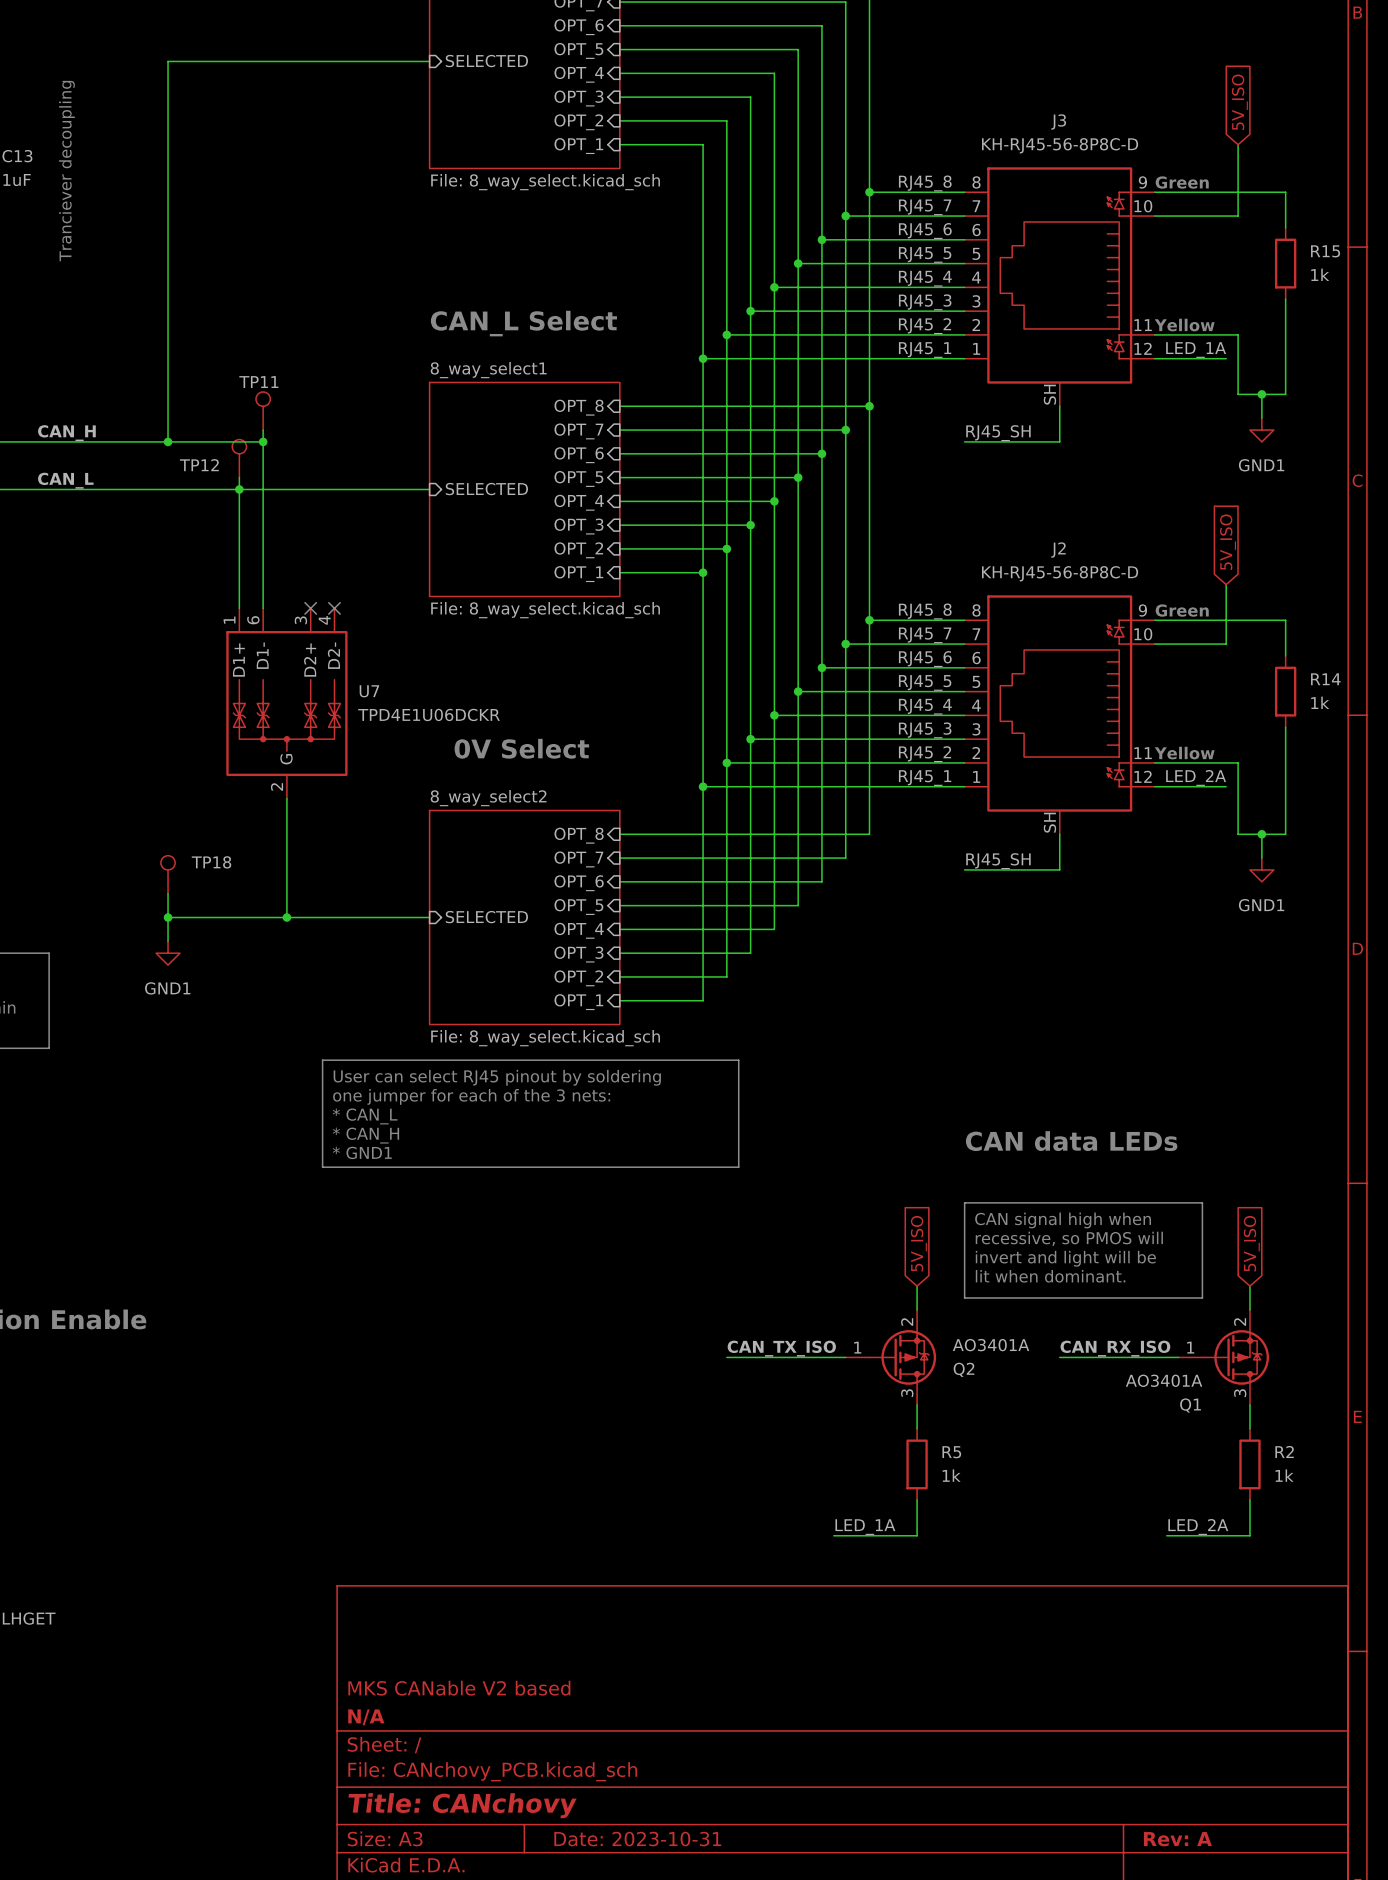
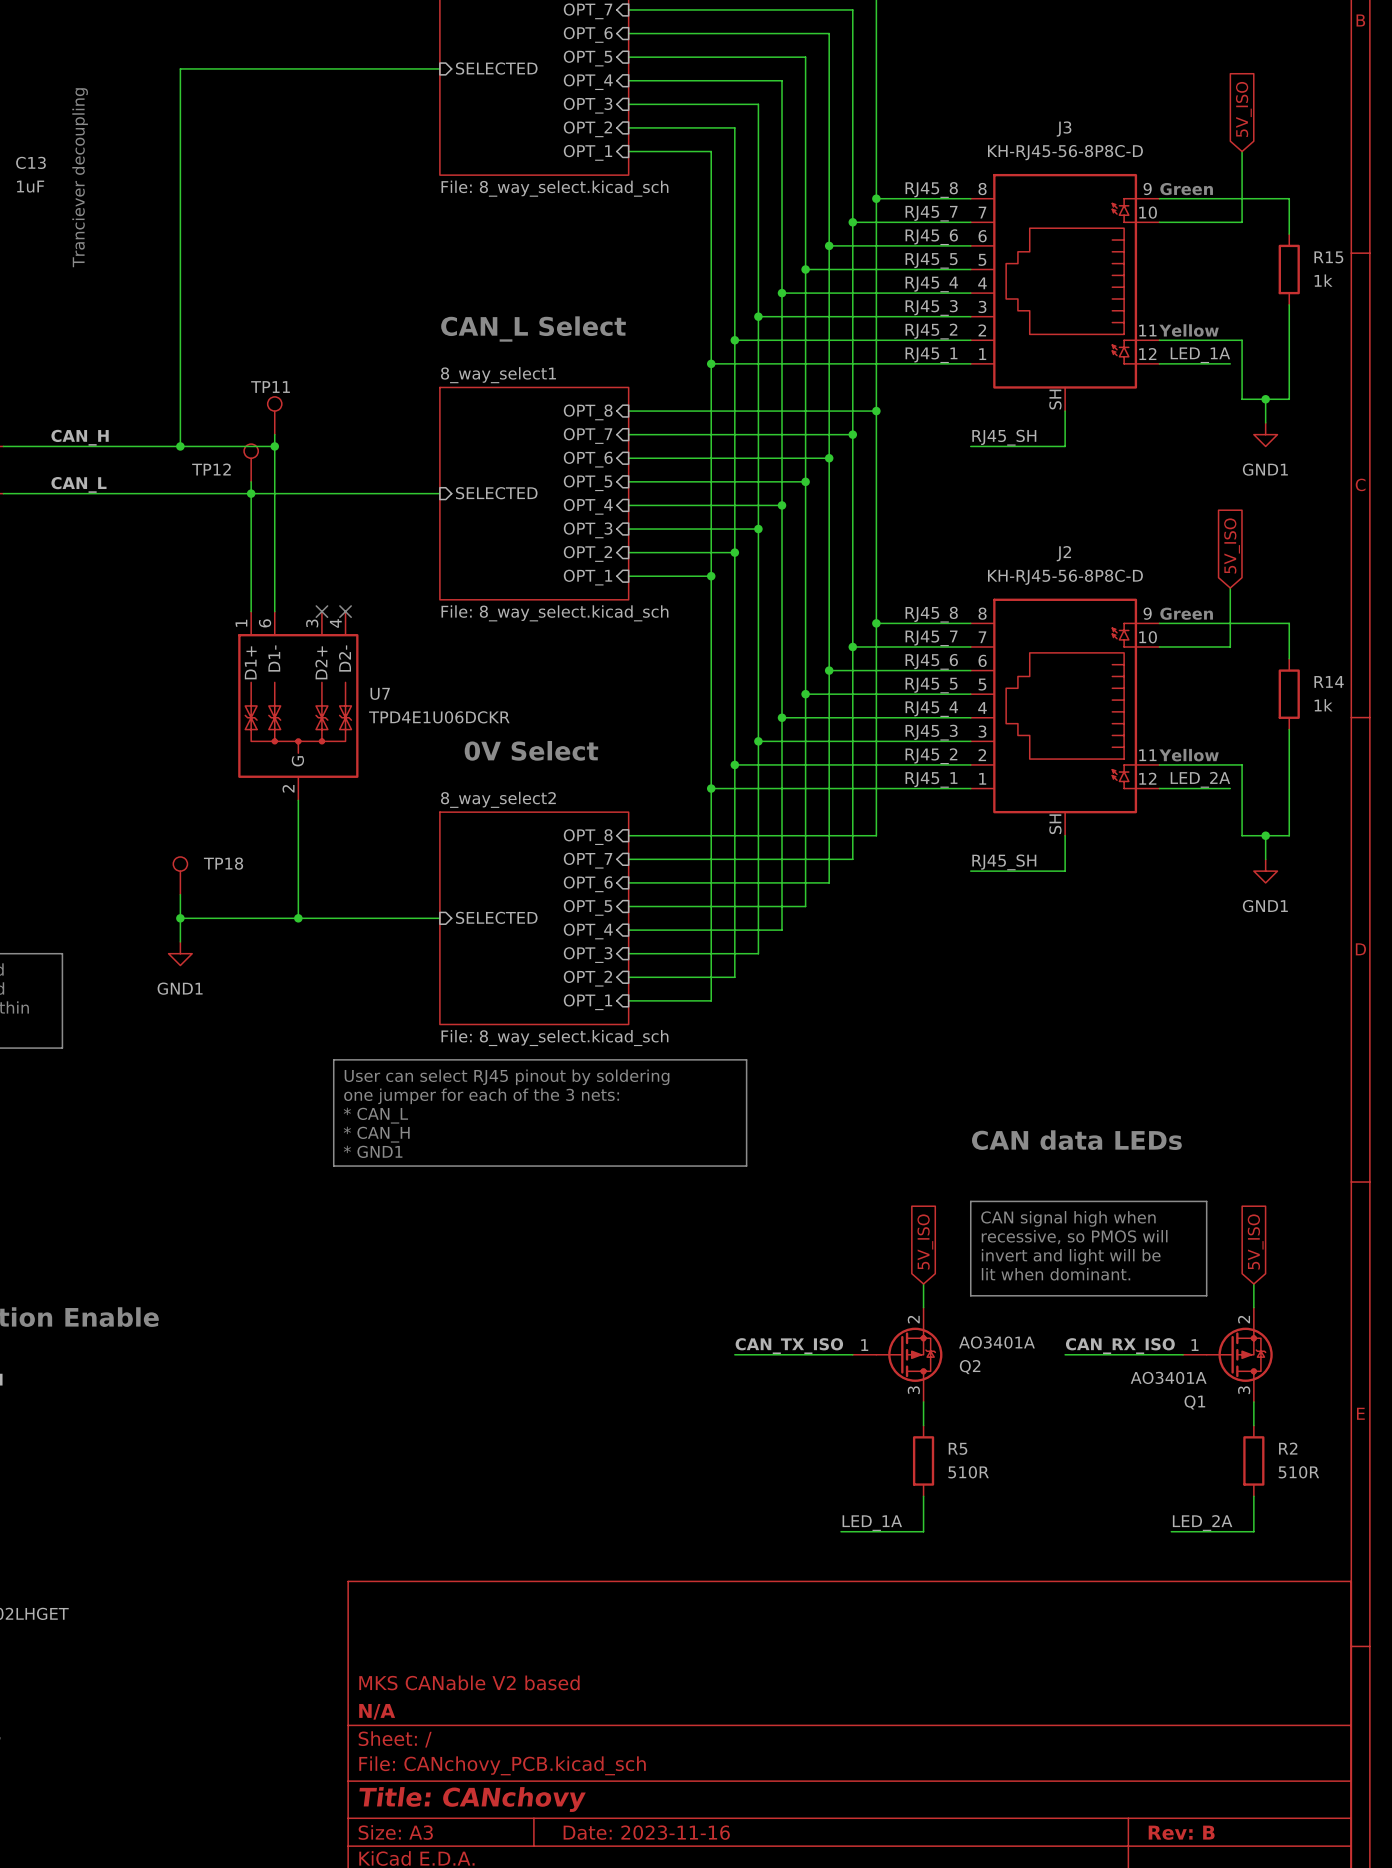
R5 value: 1k (951, 1475) -> 510R (968, 1472)
R2 value: 1k (1284, 1475) -> 510R (1298, 1472)
title block: Date: 2023-10-31 (637, 1839) -> Date: 2023-11-16 (646, 1832)
title block: Rev: A (1177, 1839) -> Rev: B (1181, 1832)

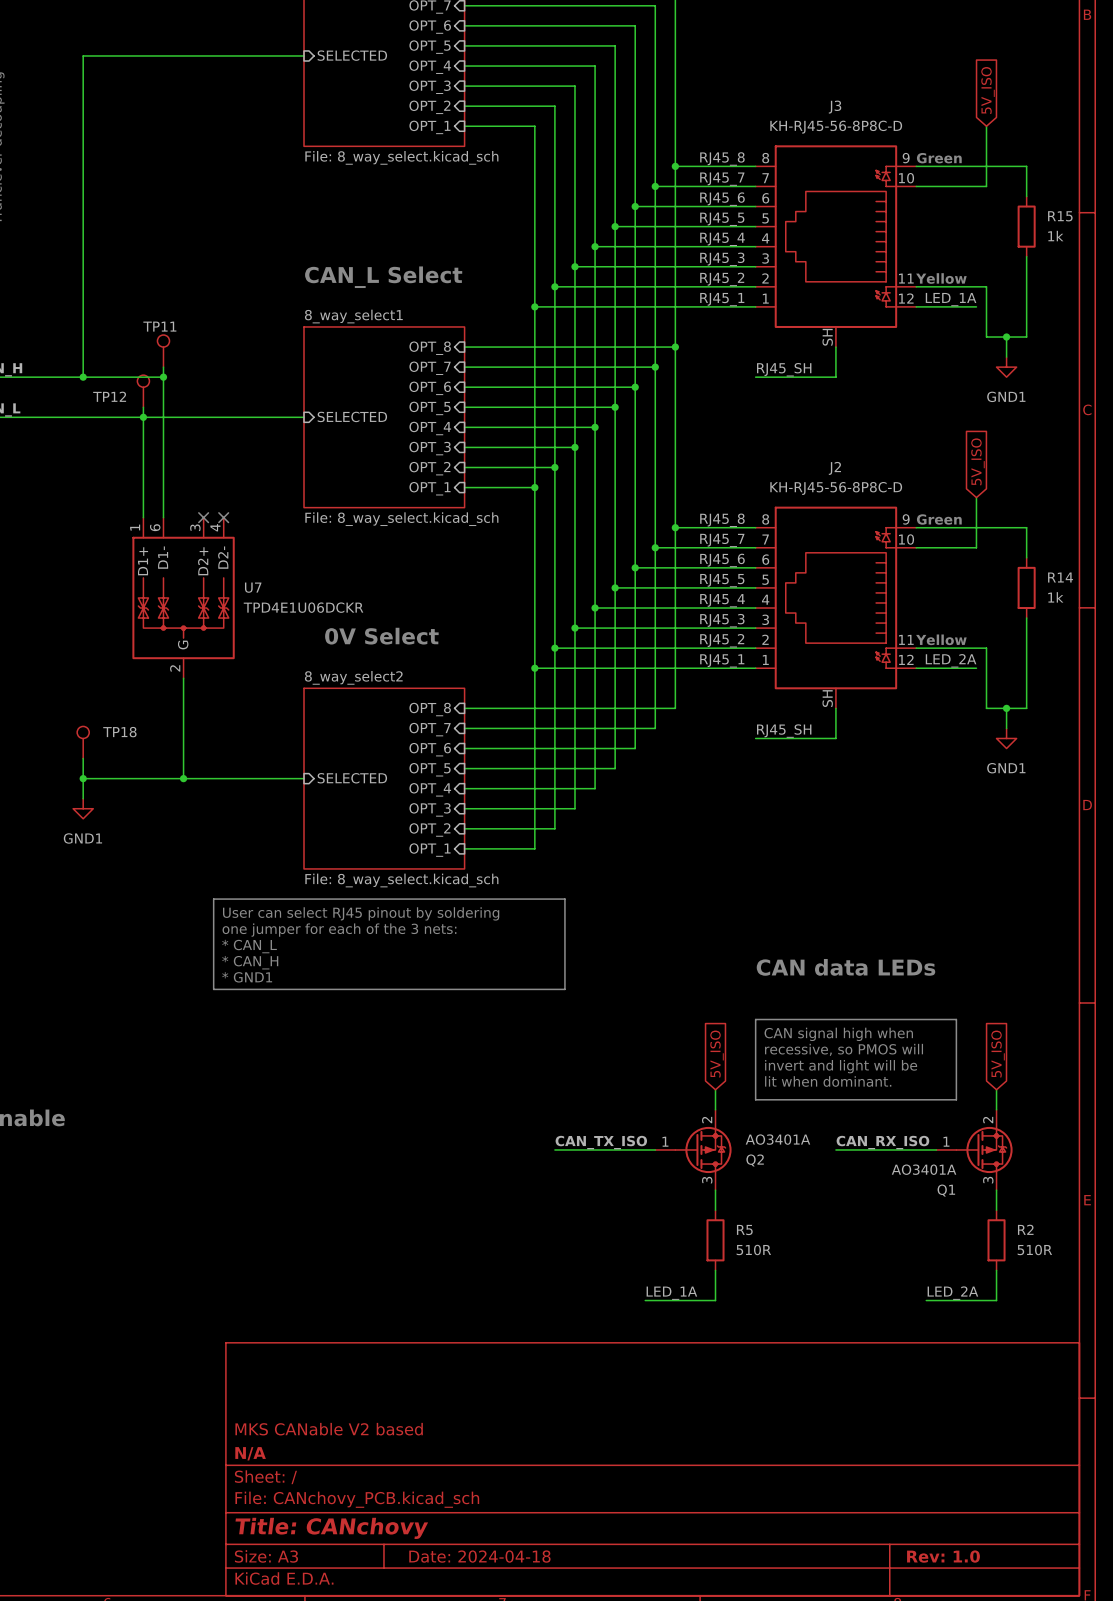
title block: Date: 2023-11-16 (646, 1832) -> Date: 2024-04-18 (479, 1556)
title block: Rev: B (1181, 1832) -> Rev: 1.0 (943, 1556)

